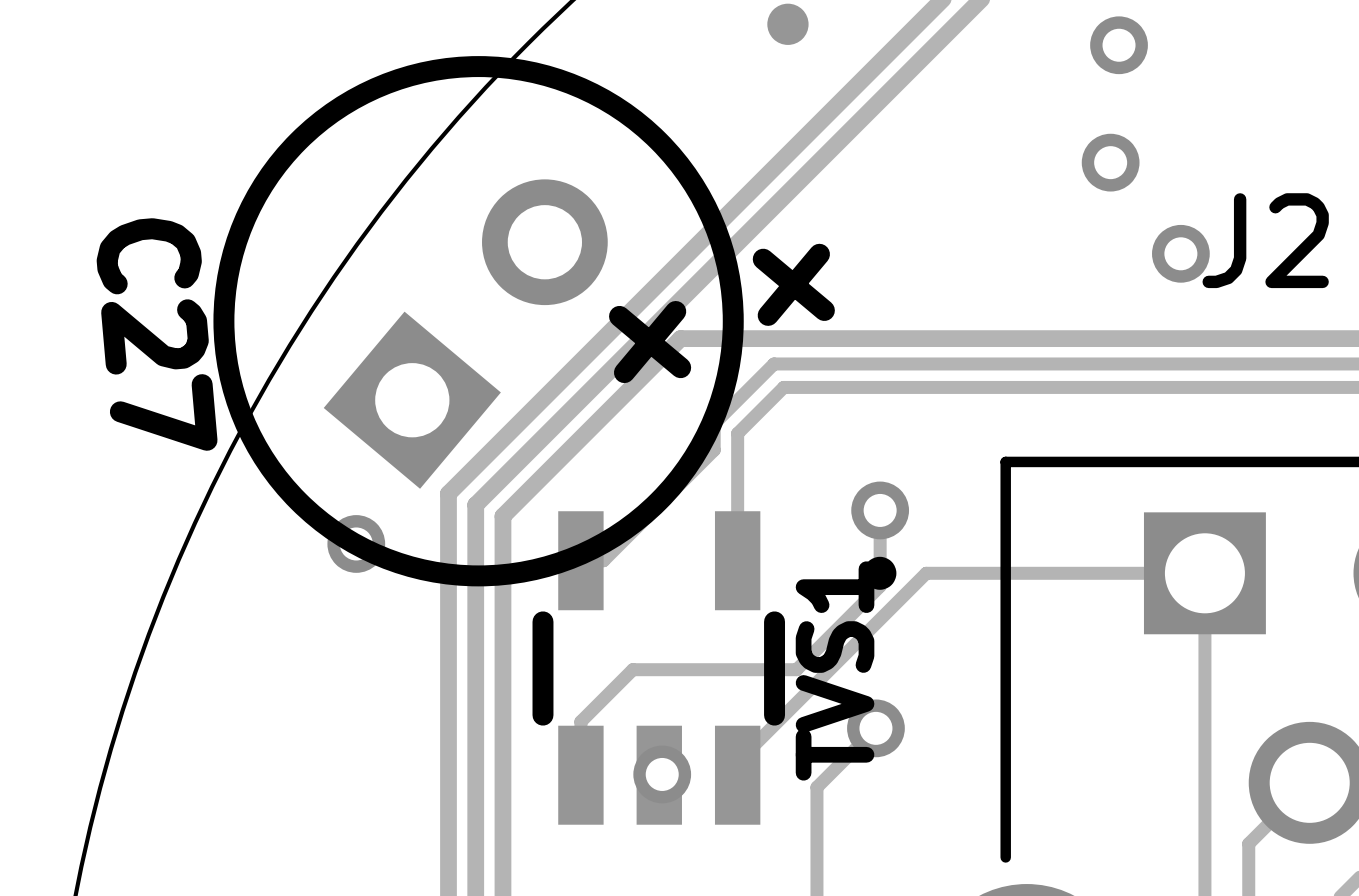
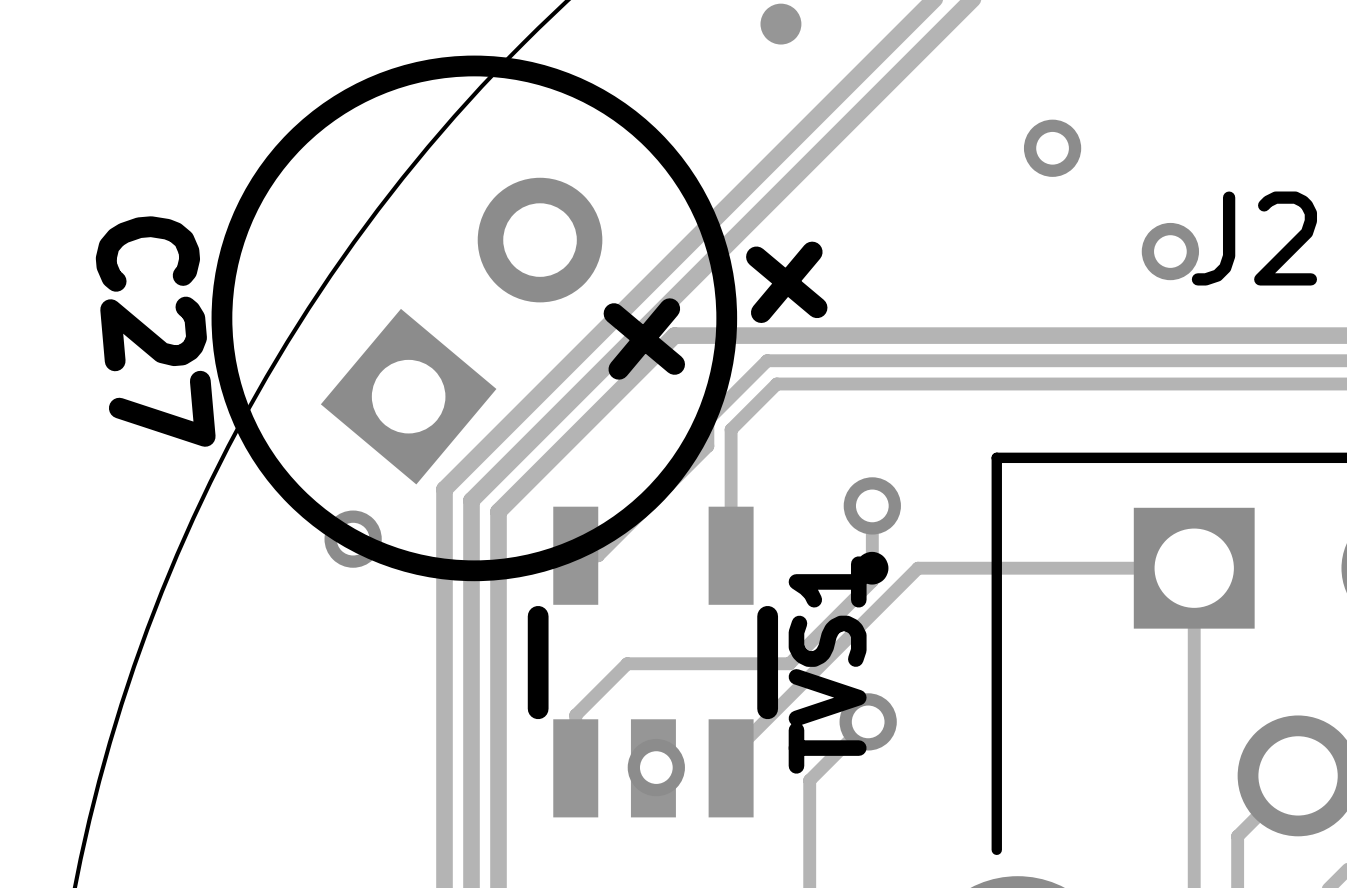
via: (1119, 45) -> none
via position: (1110, 162) -> (1052, 148)

